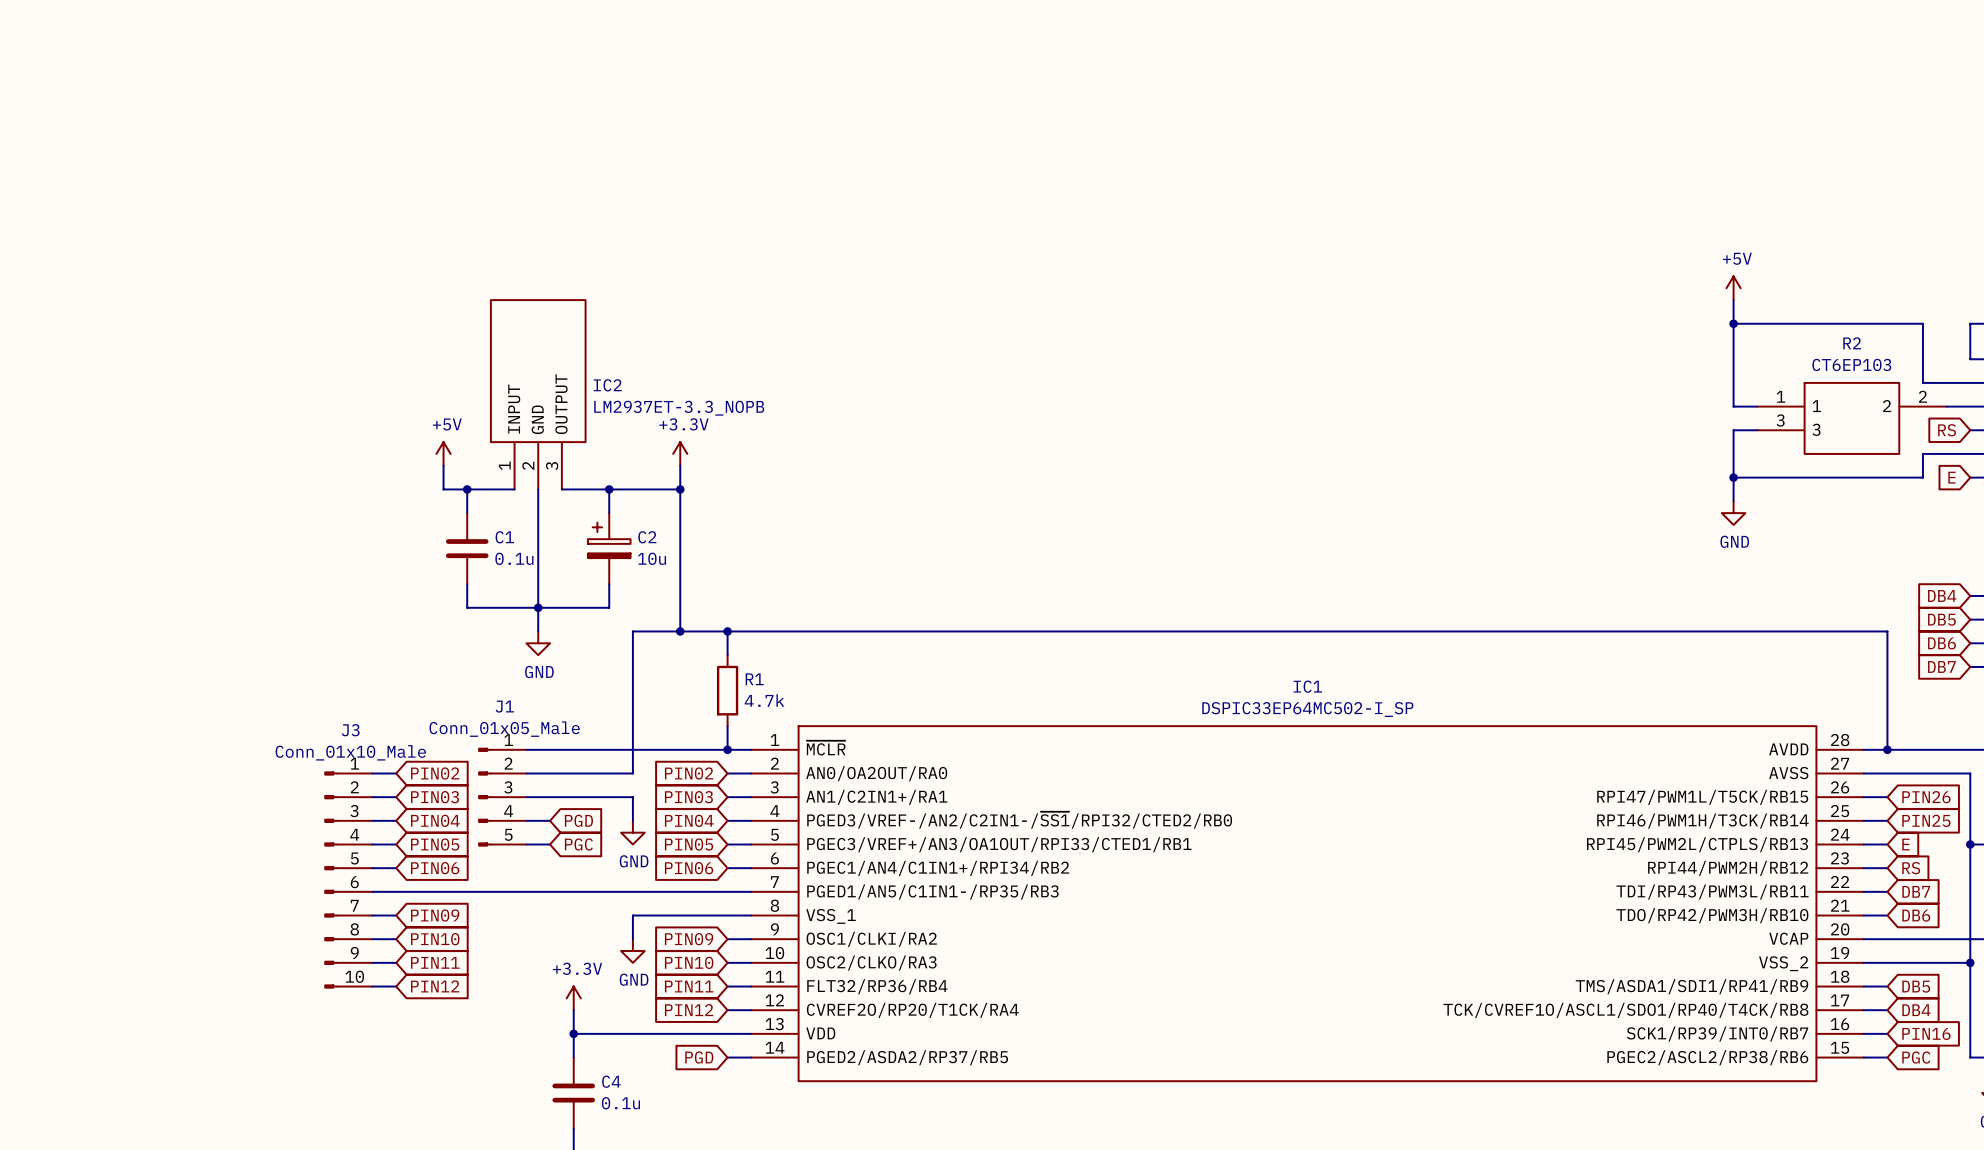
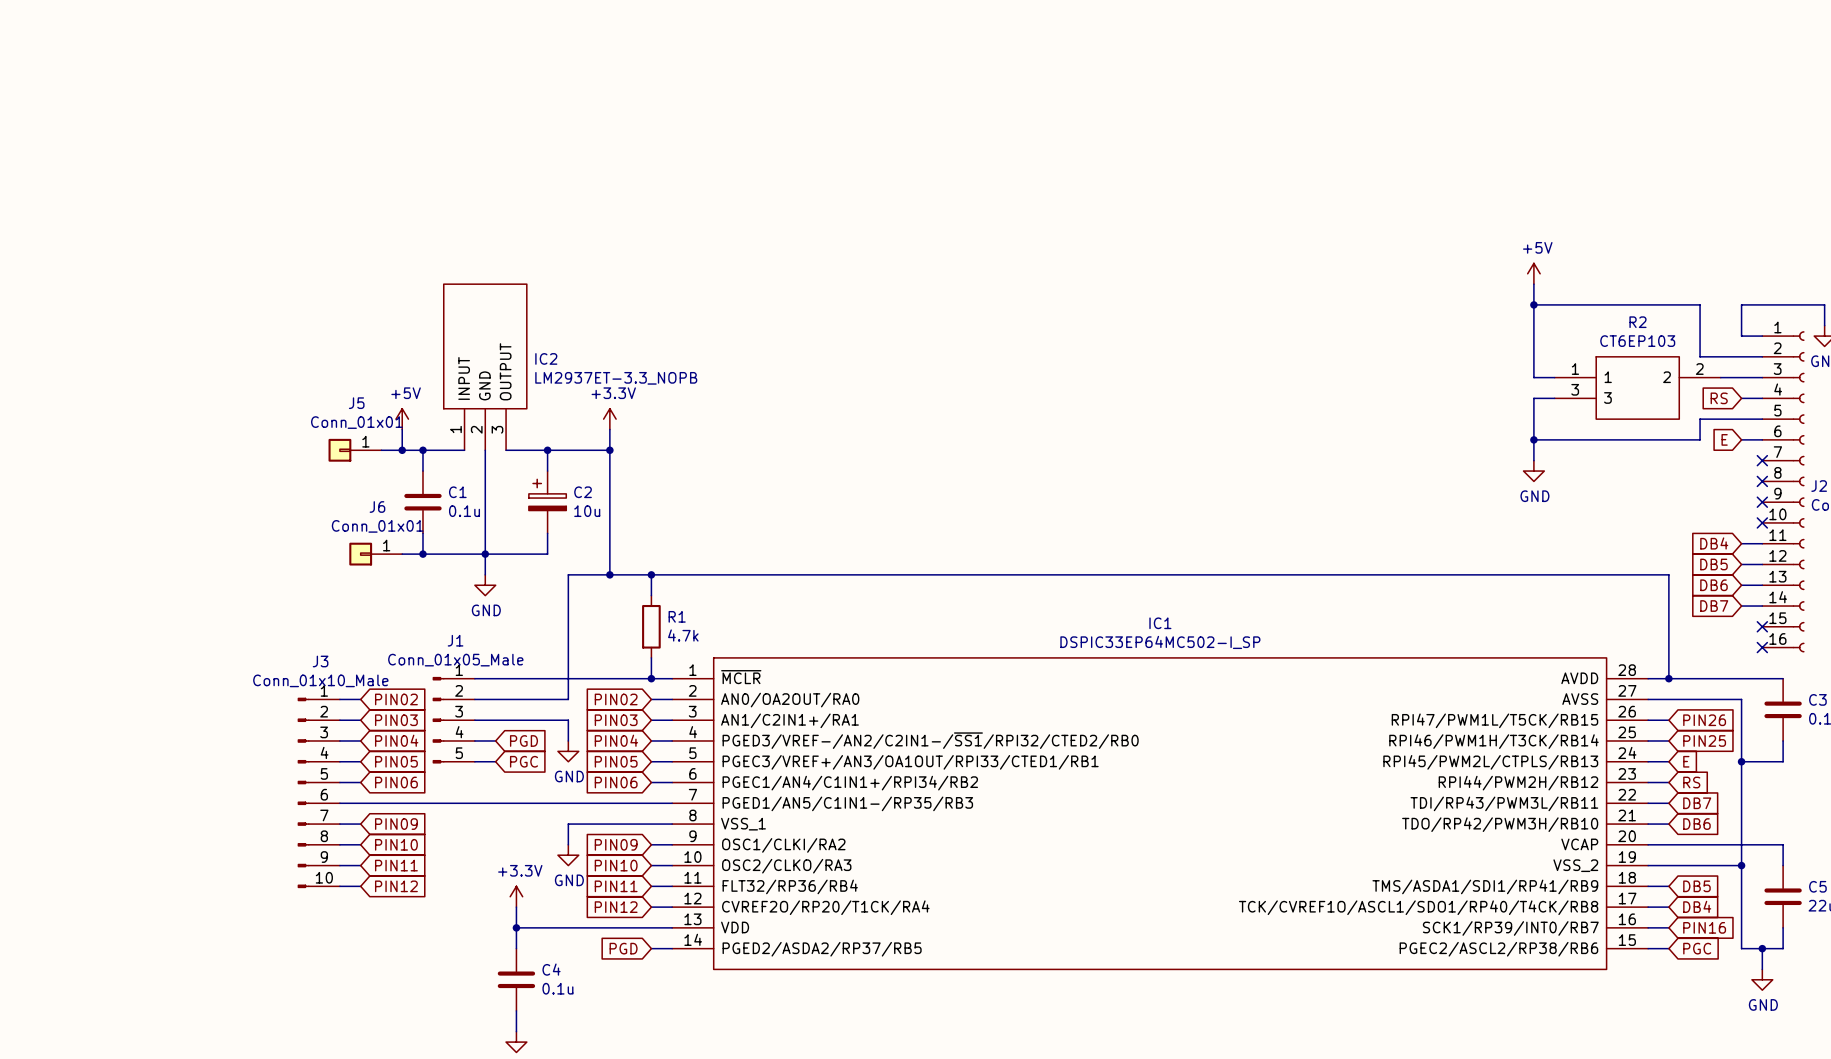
J5: none -> Conn_01x01 (354, 450)
wire: none -> (381, 450) (402, 450)
junction: none -> (402, 450)
J6: none -> Conn_01x01 (375, 554)
wire: none -> (402, 554) (422, 554)
junction: none -> (422, 554)

